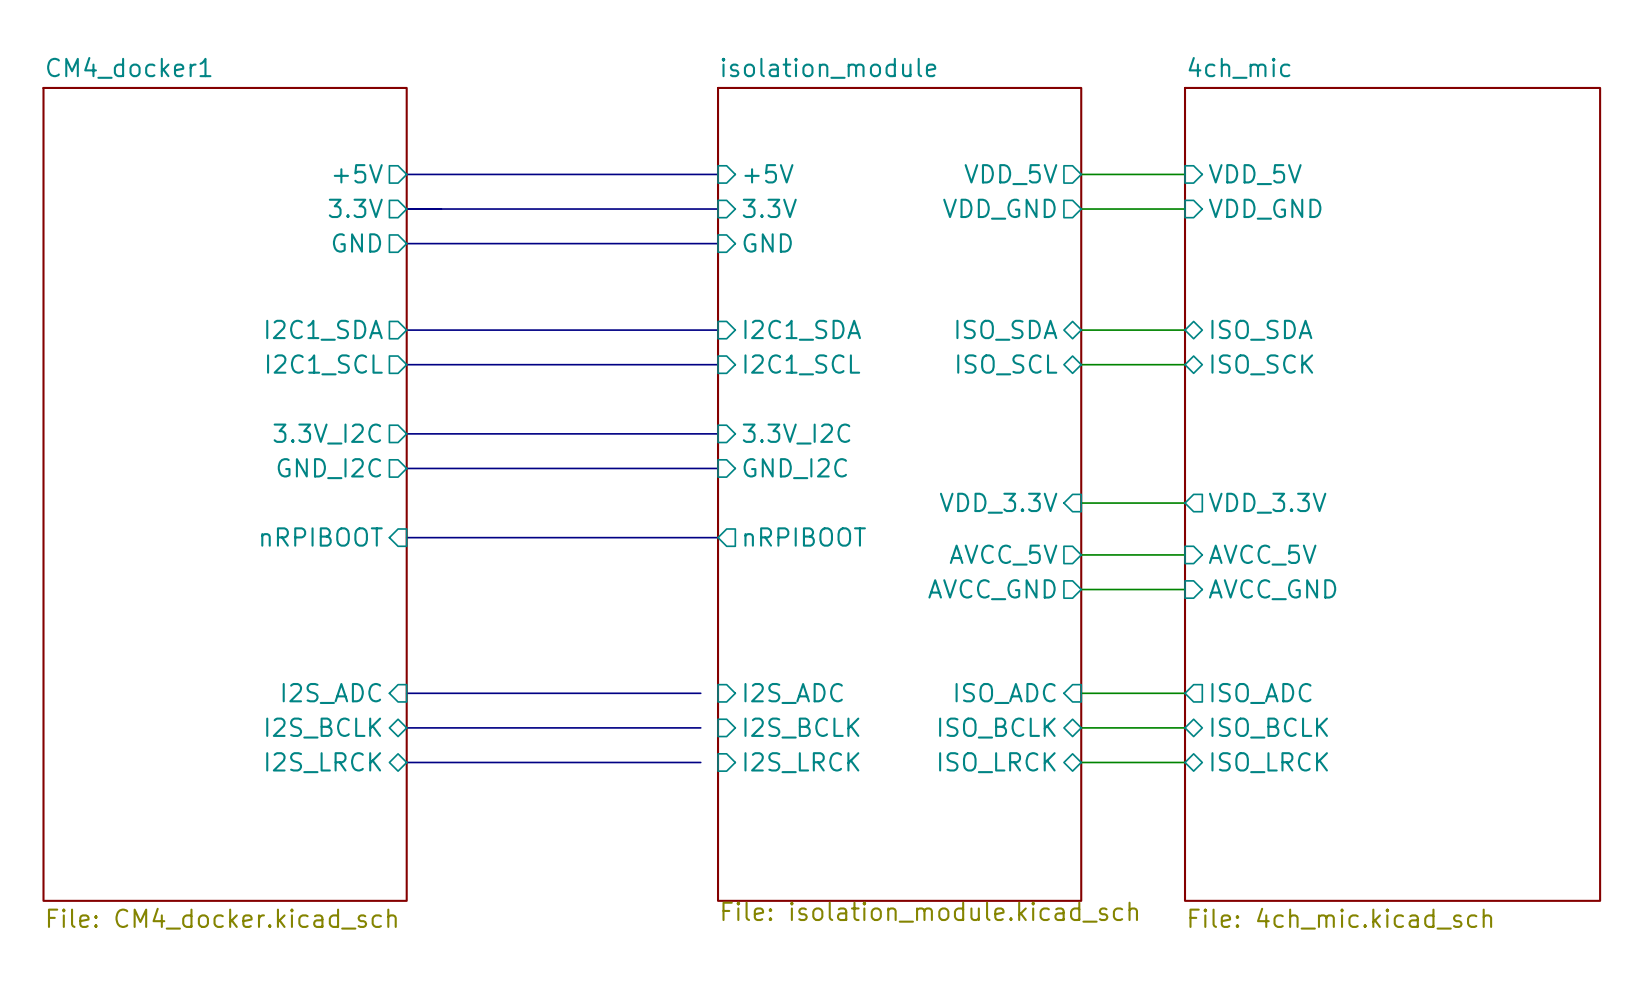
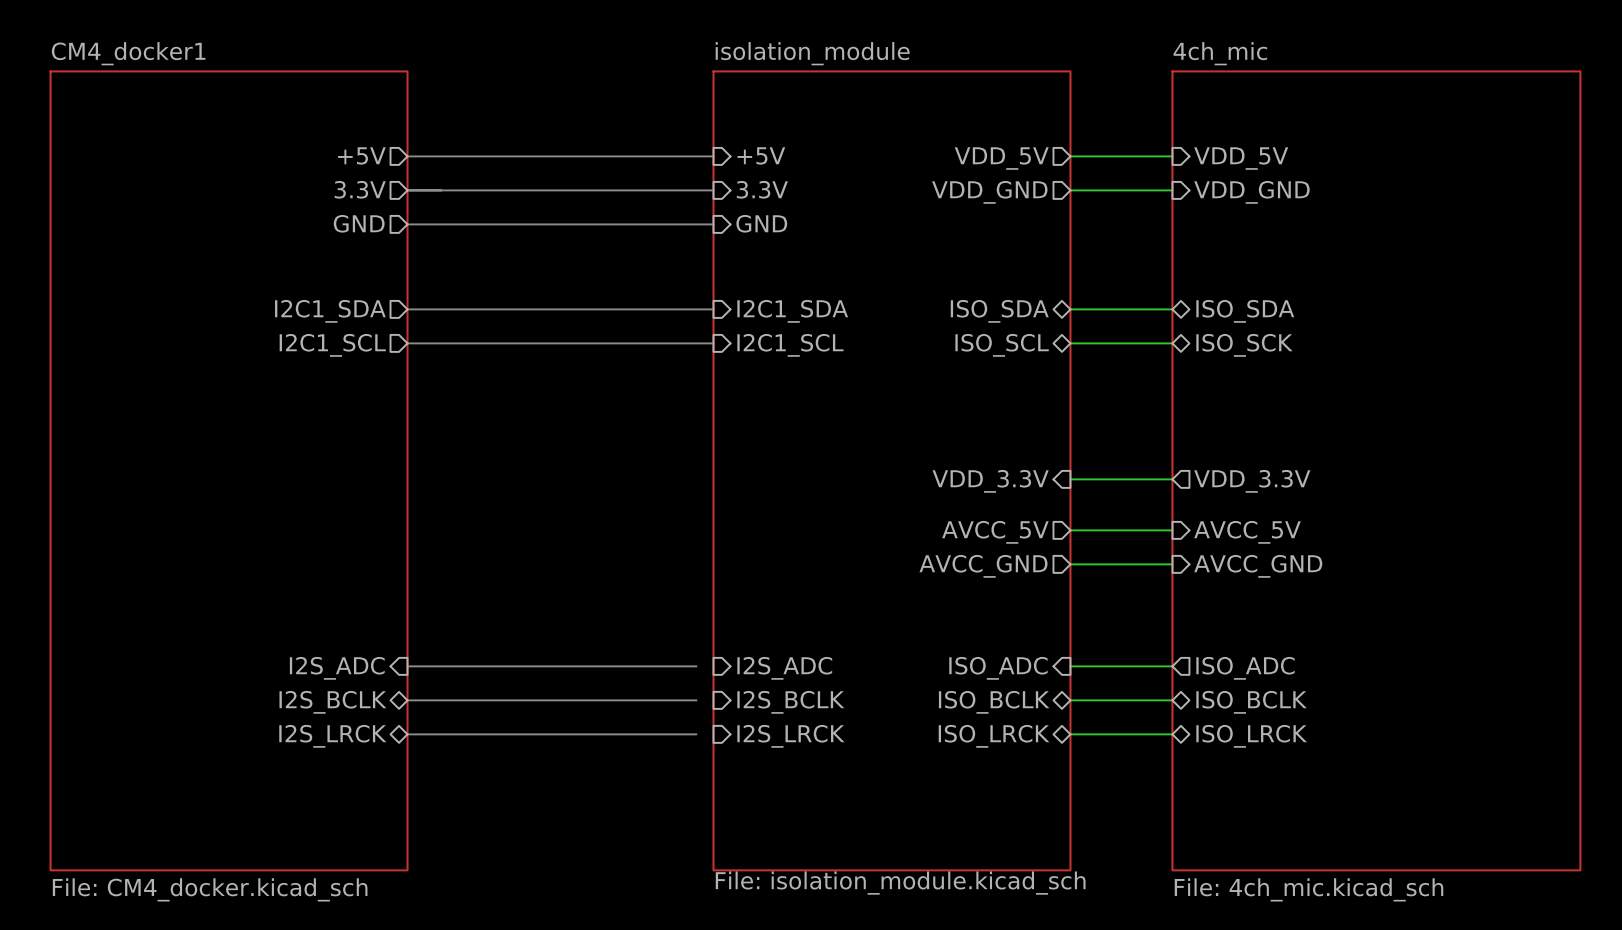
line: (406, 433) (718, 433) -> none
sheet pin: 3.3V_I2C (327, 434) -> none
sheet pin: 3.3V_I2C (796, 434) -> none
sheet pin: GND_I2C (329, 468) -> none
line: (406, 468) (718, 468) -> none
sheet pin: GND_I2C (795, 468) -> none
sheet pin: nRPIBOOT (322, 536) -> none
sheet pin: nRPIBOOT (805, 536) -> none
line: (406, 537) (718, 537) -> none

